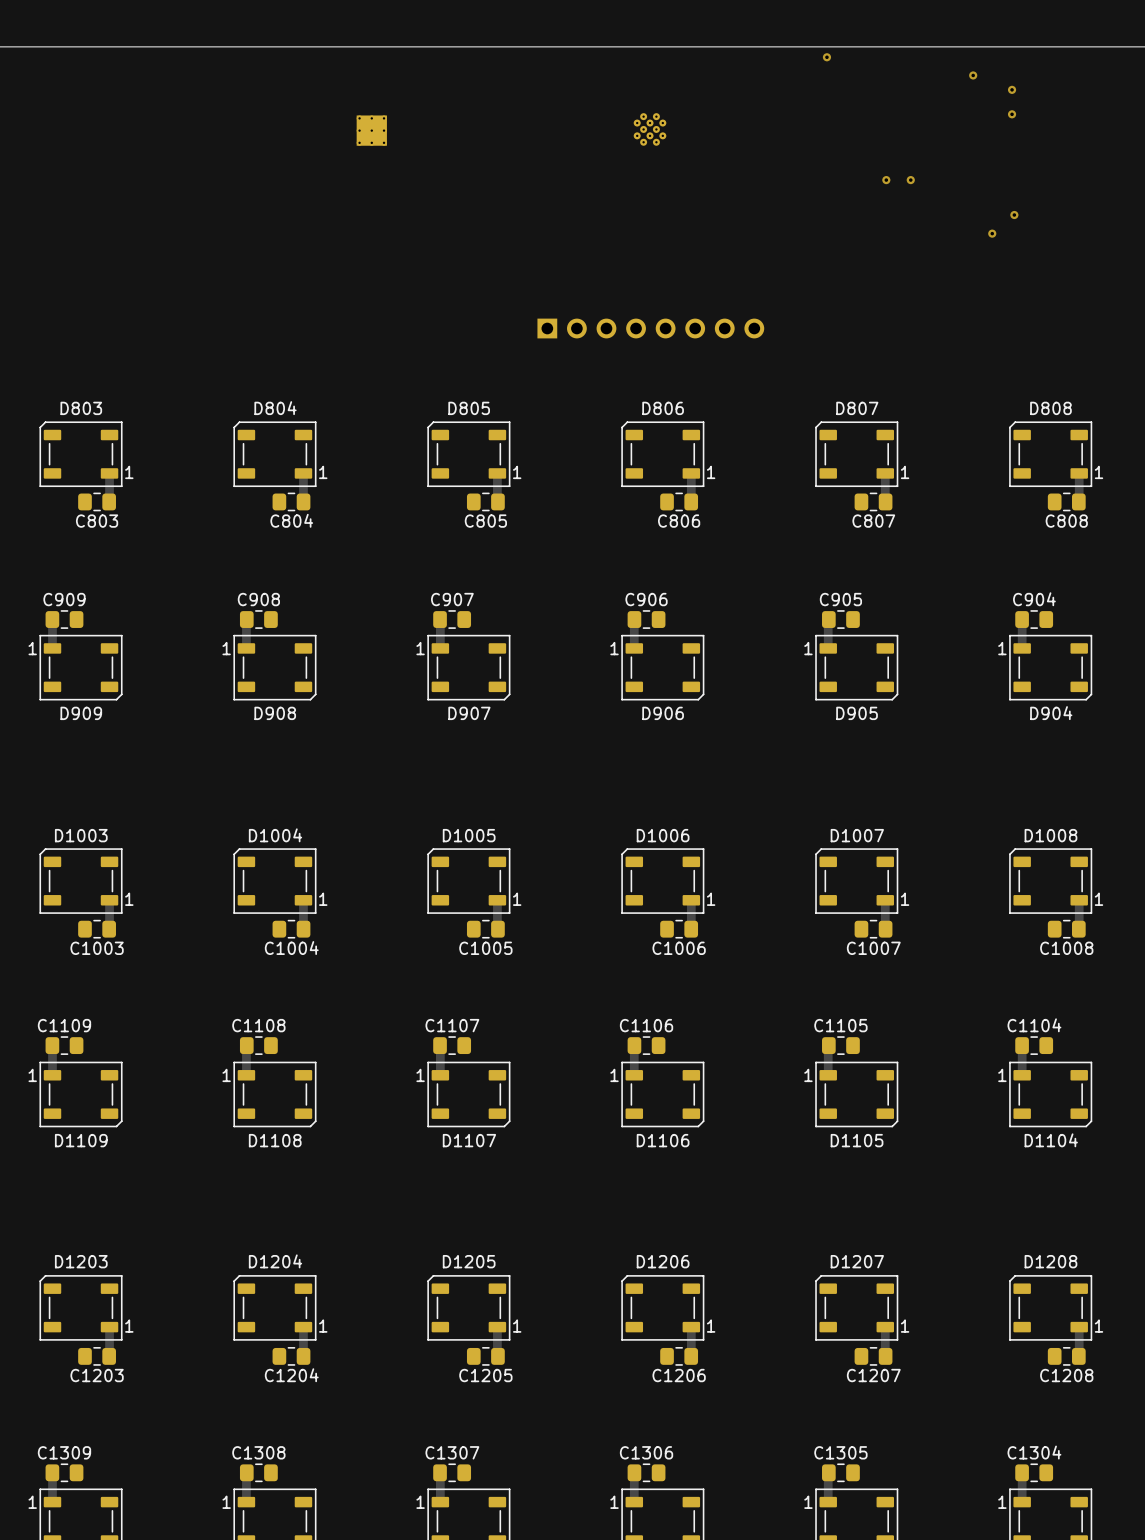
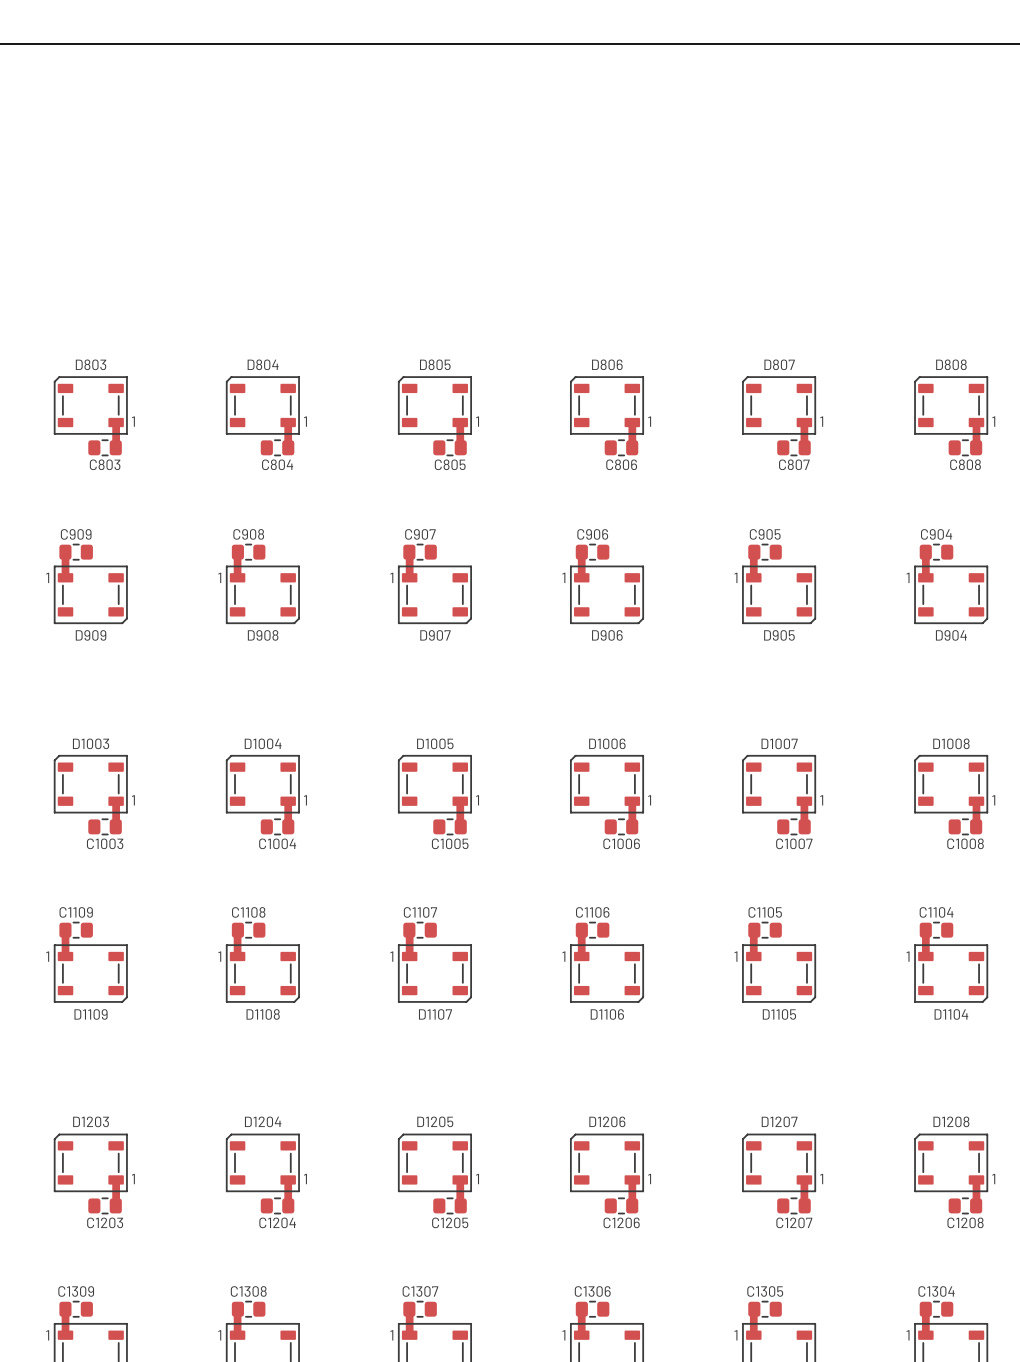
via: (826, 57) -> none
via: (973, 75) -> none
via: (1012, 89) -> none
via: (1012, 114) -> none
part: (650, 129) -> none
part: (371, 130) -> none
via: (886, 180) -> none
via: (910, 180) -> none
via: (1014, 215) -> none
via: (992, 233) -> none
part: (650, 328) -> none

